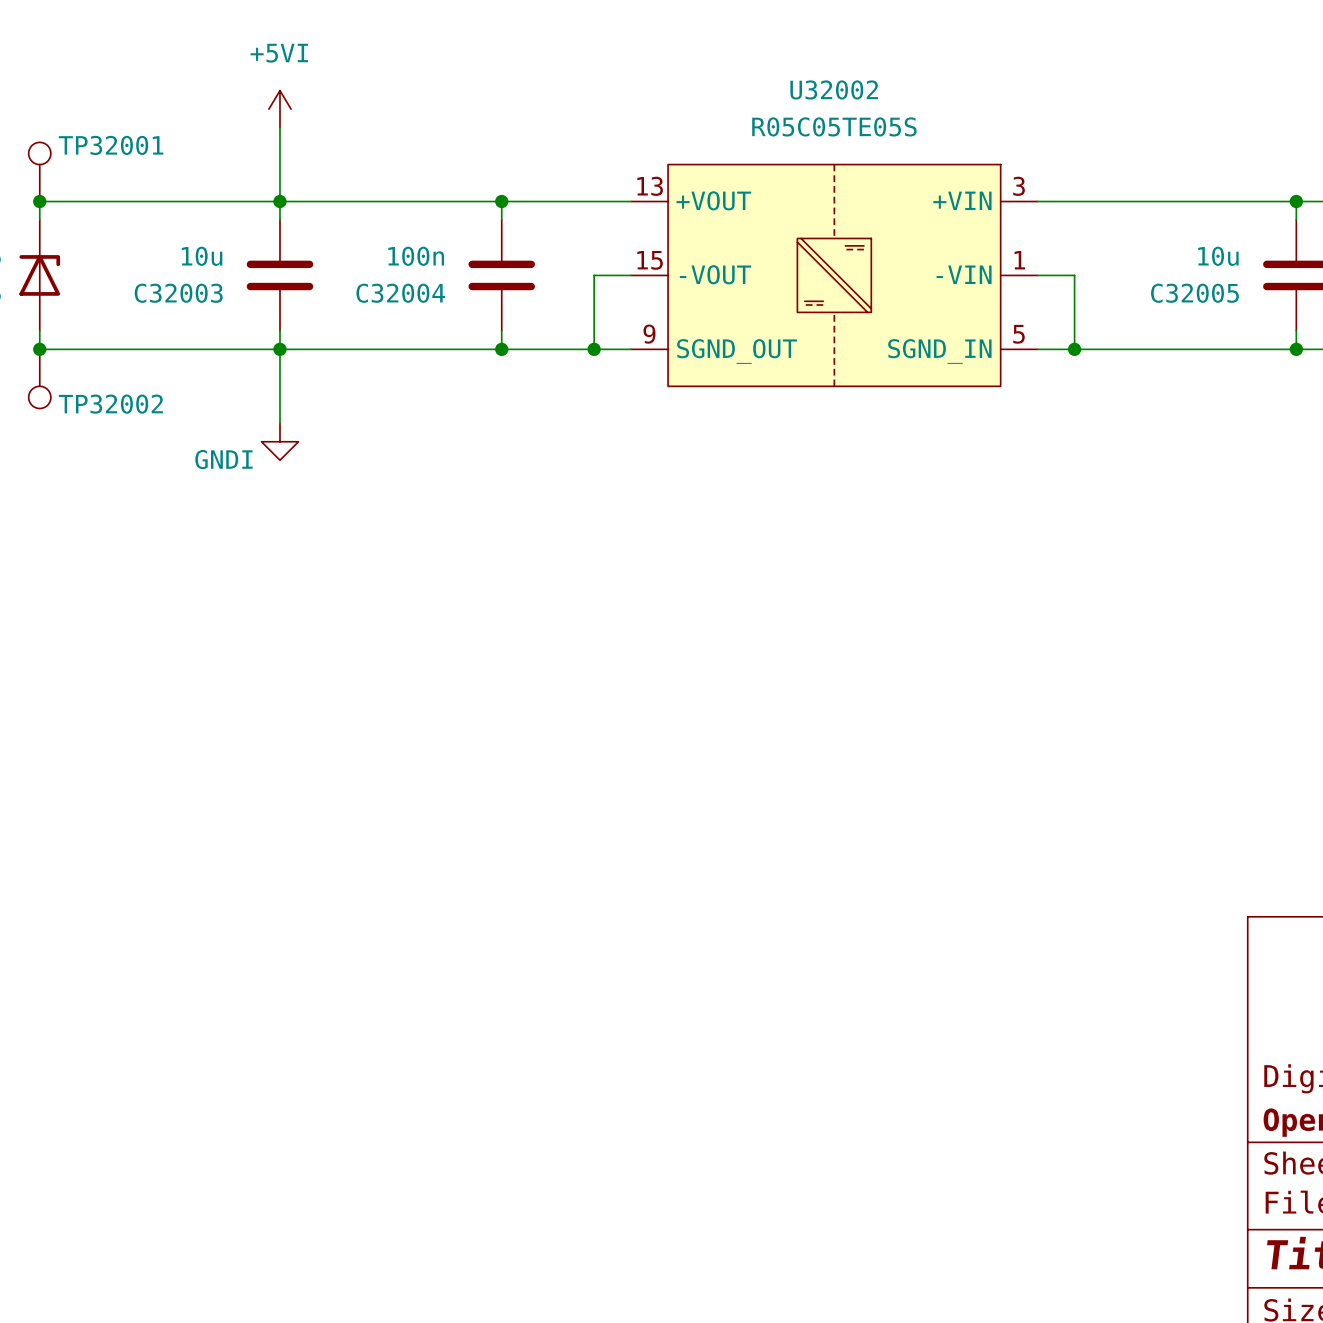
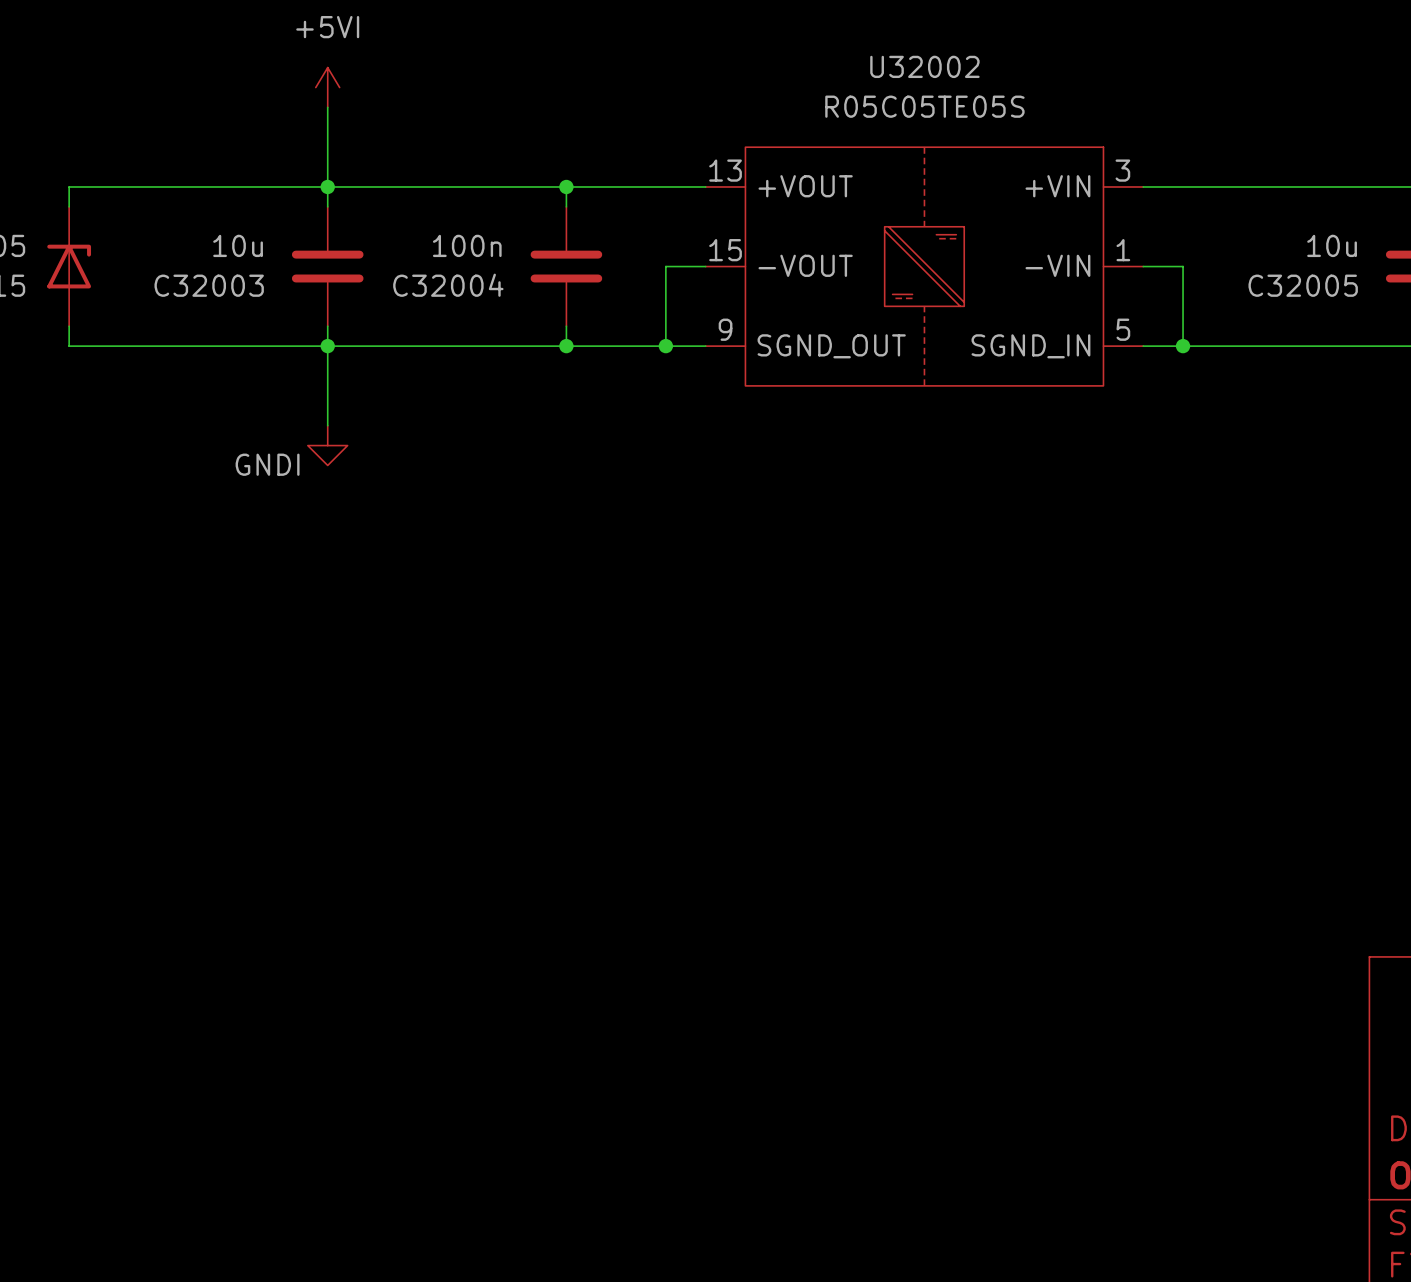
TP32001: (39, 171) -> none
junction: (39, 201) -> none
junction: (39, 349) -> none
TP32002: (39, 378) -> none

